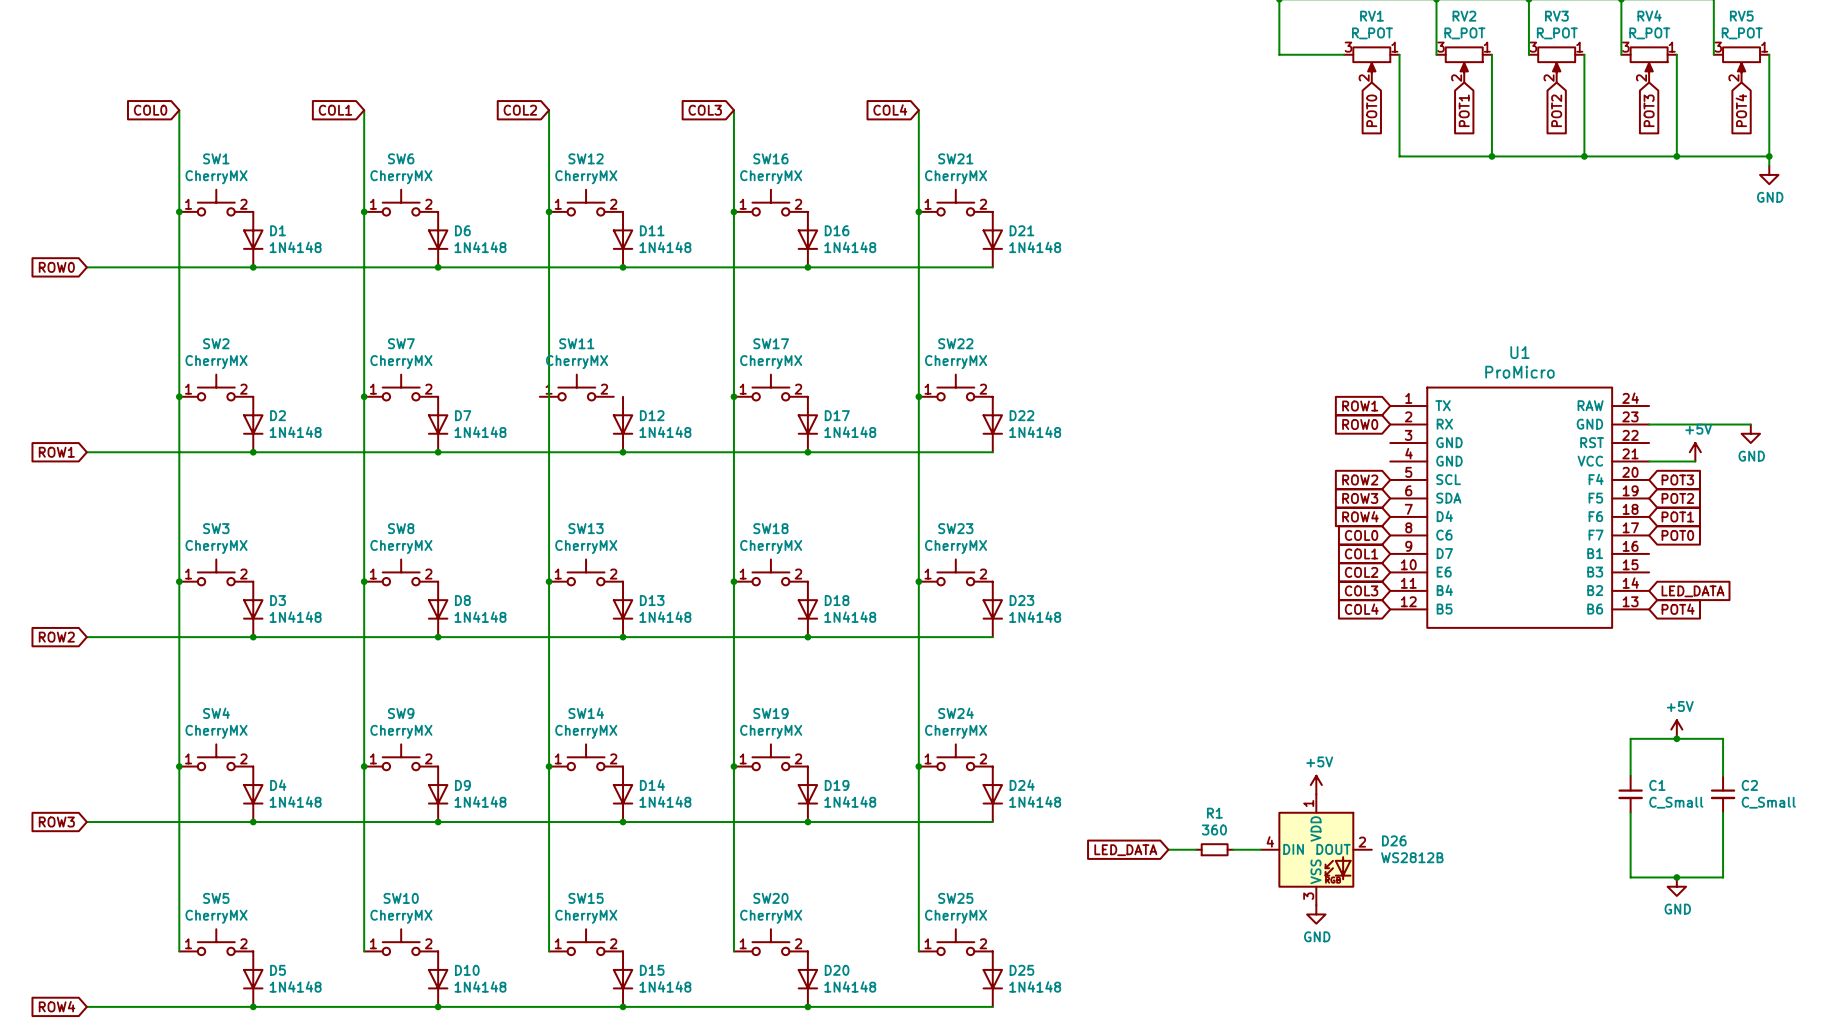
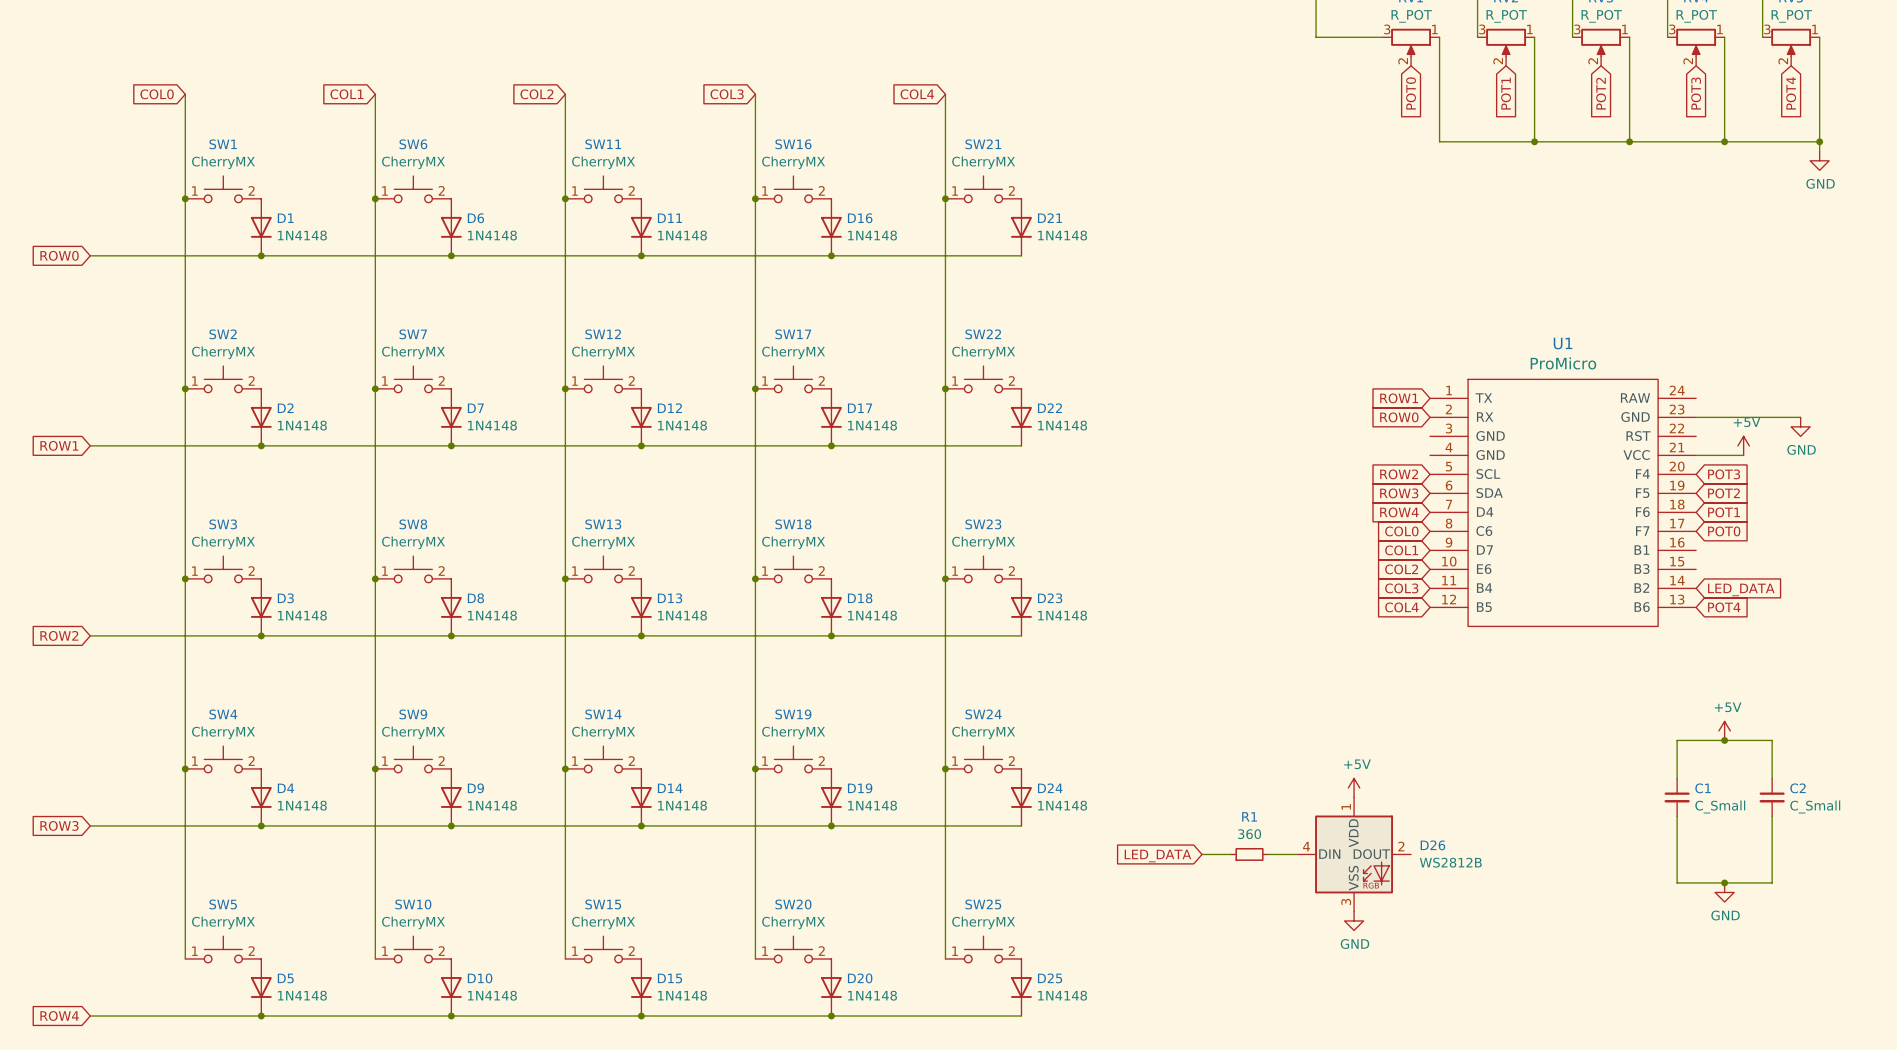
SW12 name: SW12 (586, 158) -> SW11 (603, 144)
SW11: CherryMX (576, 387) -> none
SW12: none -> CherryMX (603, 379)
junction: none -> (565, 388)

